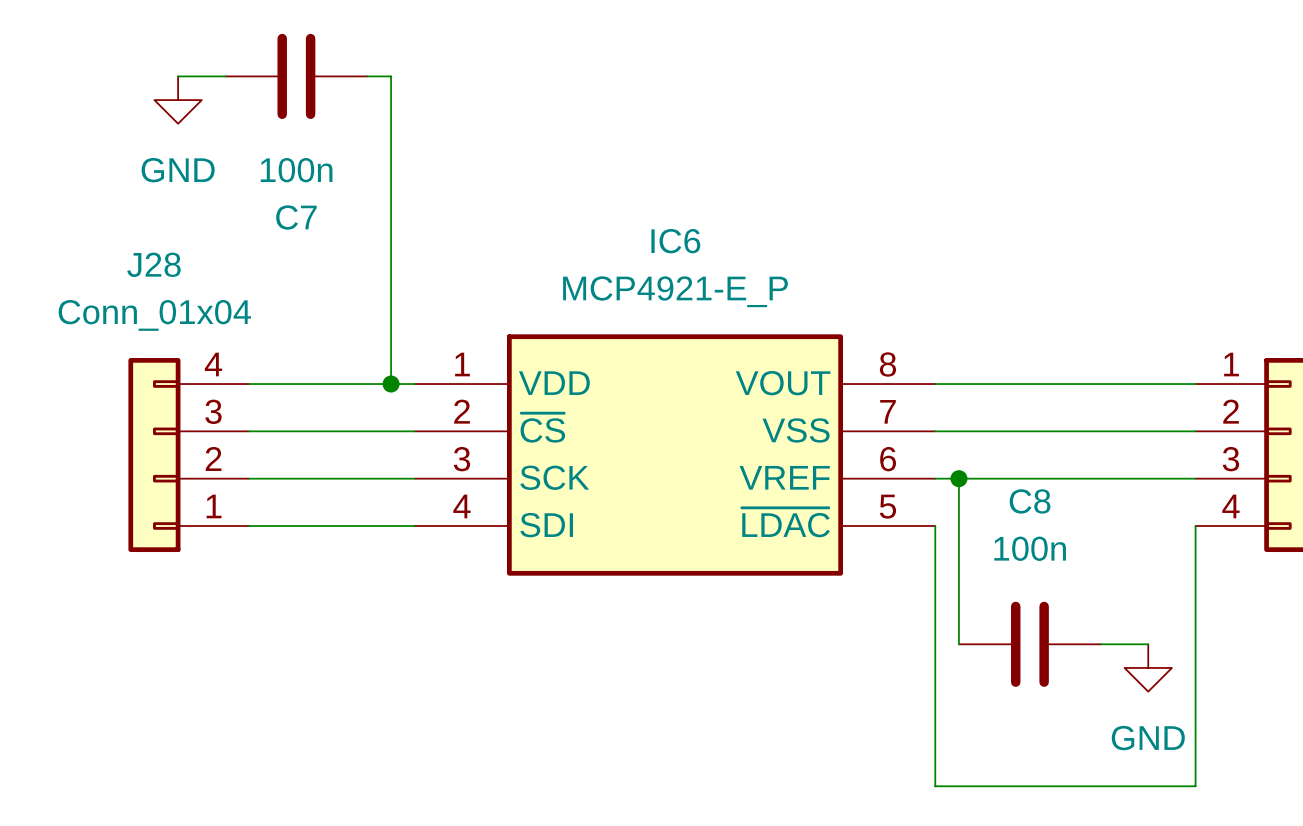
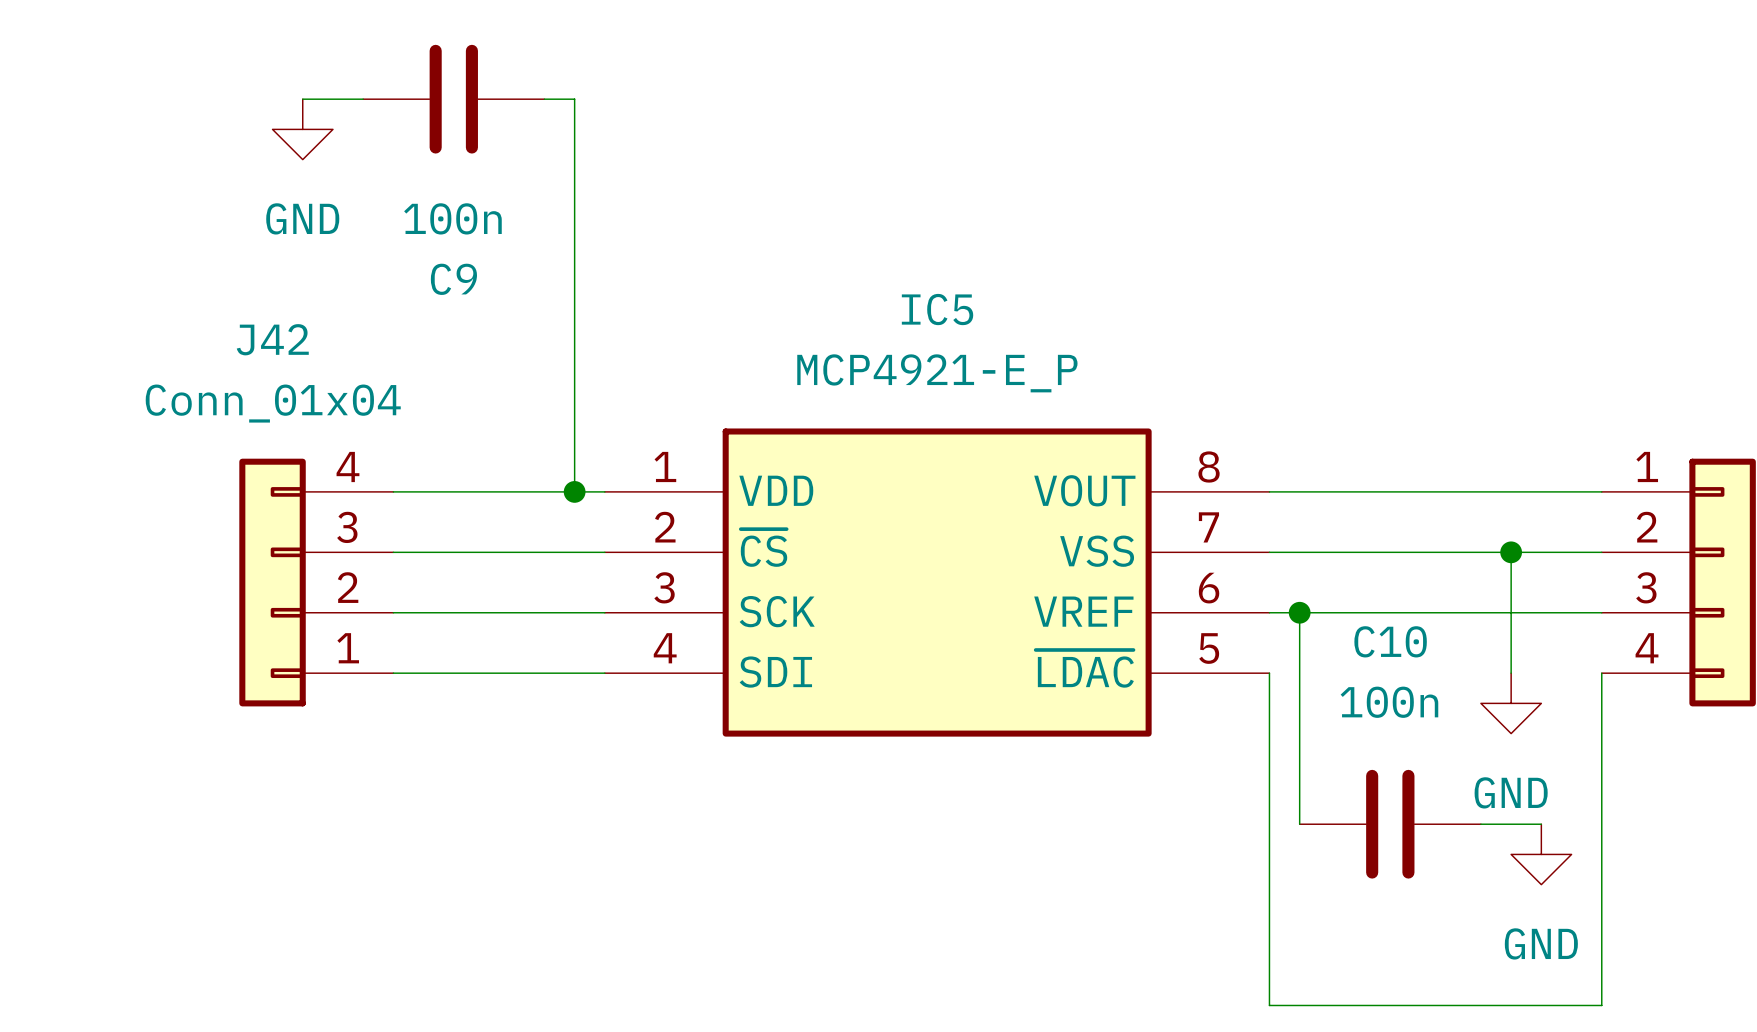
C7 name: C7 (296, 217) -> C9 (453, 279)
IC6 name: IC6 (675, 241) -> IC5 (937, 309)
J28 name: J28 (153, 264) -> J42 (272, 339)
wire: none -> (1511, 552) (1511, 673)
junction: none -> (1511, 552)
C8 name: C8 (1030, 501) -> C10 (1390, 641)
power symbol: none -> GND (1511, 703)

